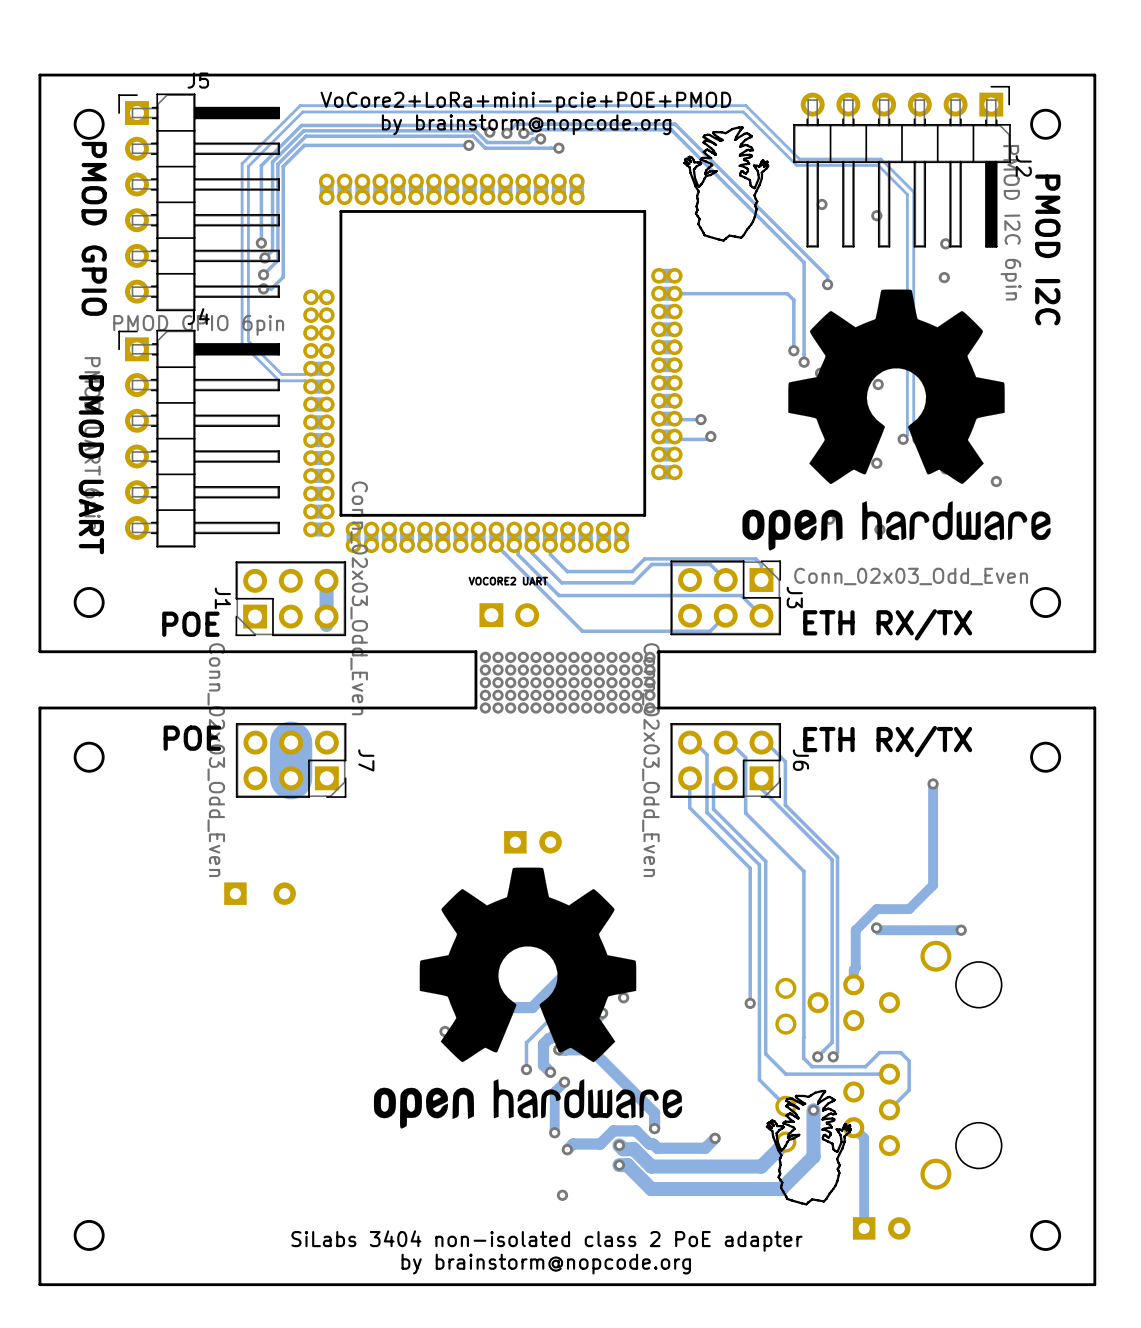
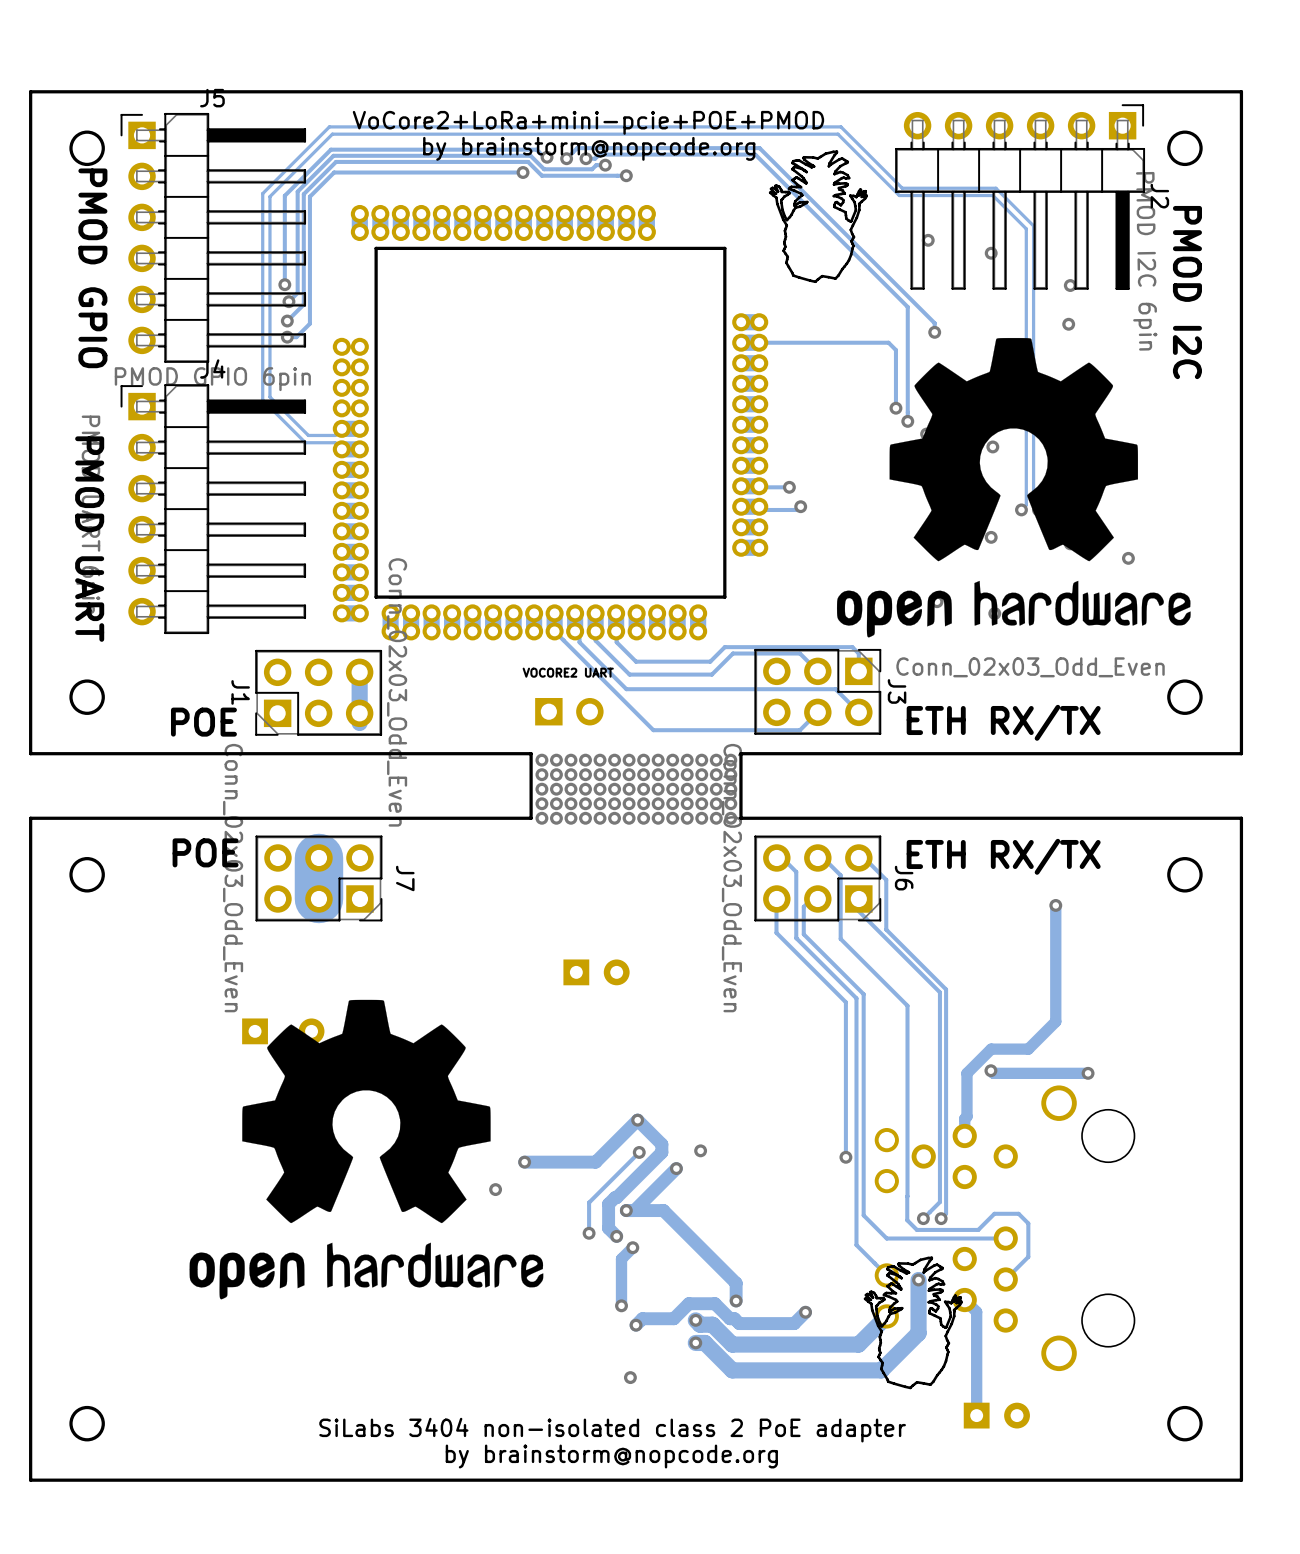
drawing position: (527, 998) -> (366, 1149)

